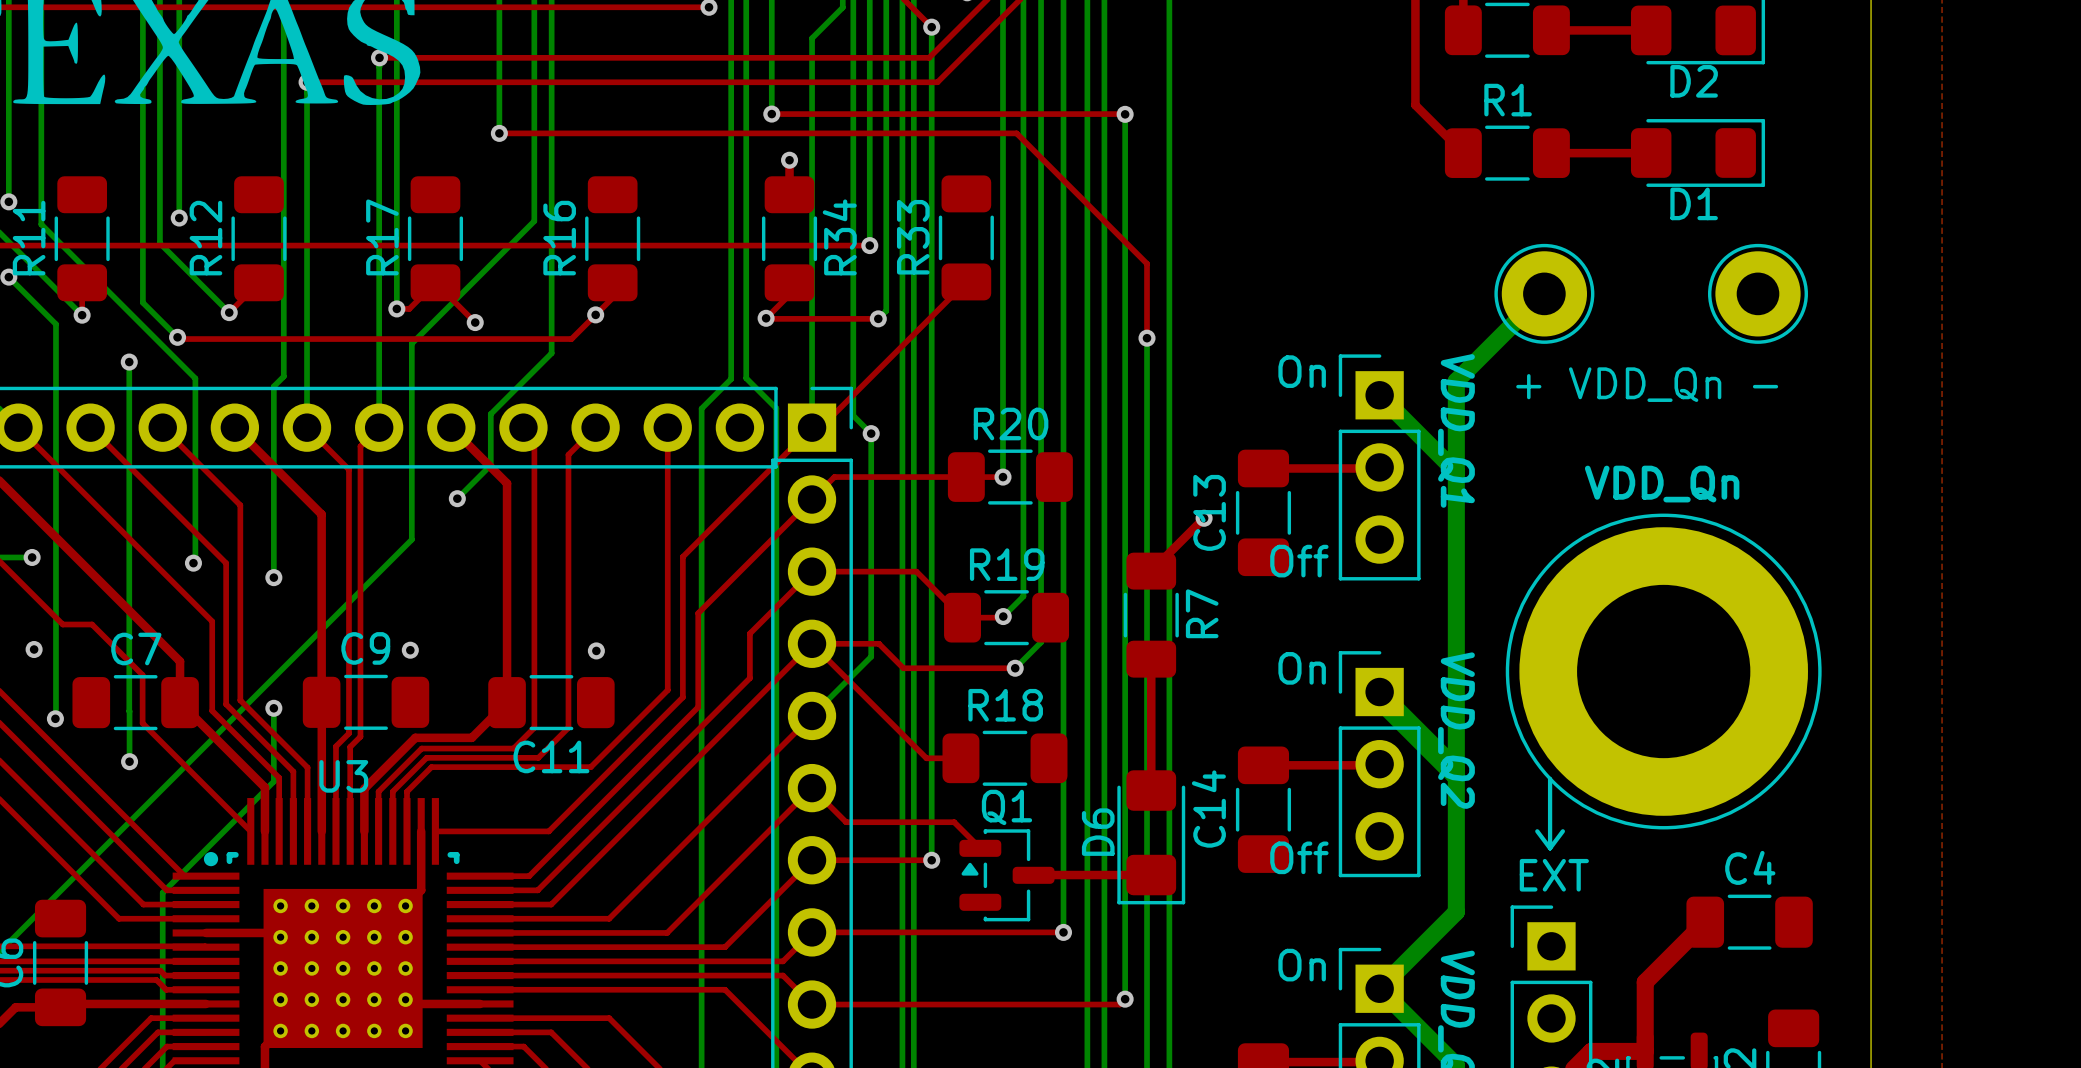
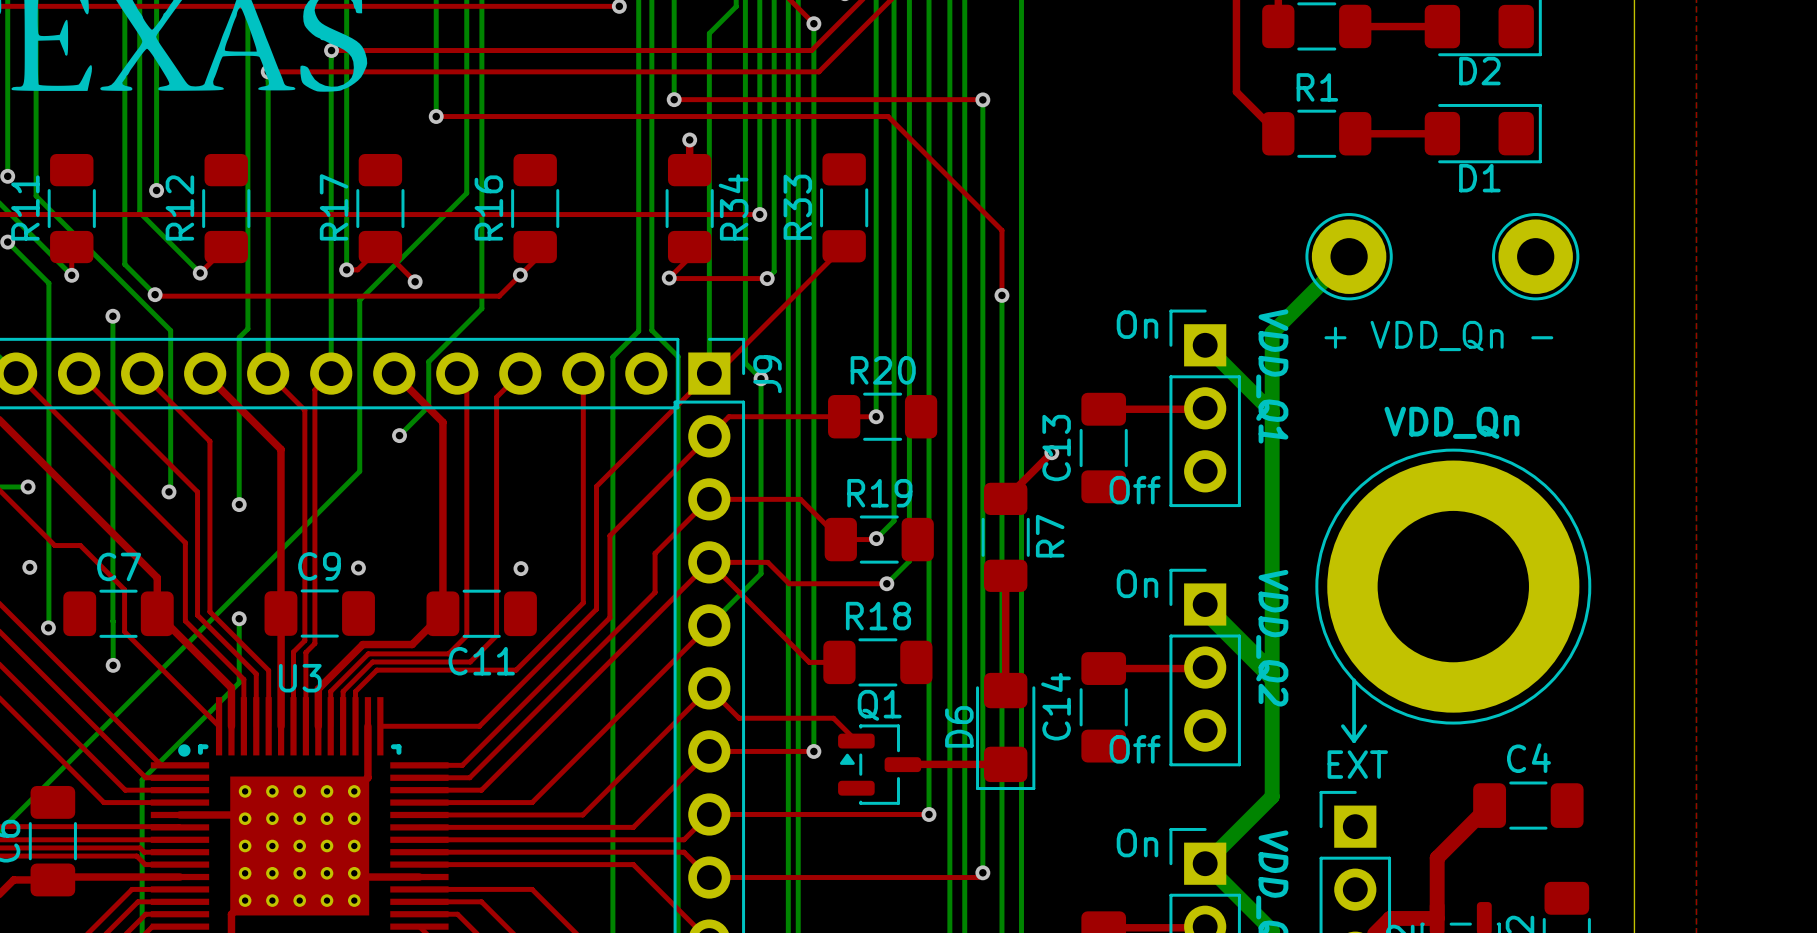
J9 name: none -> J9 (767, 374)

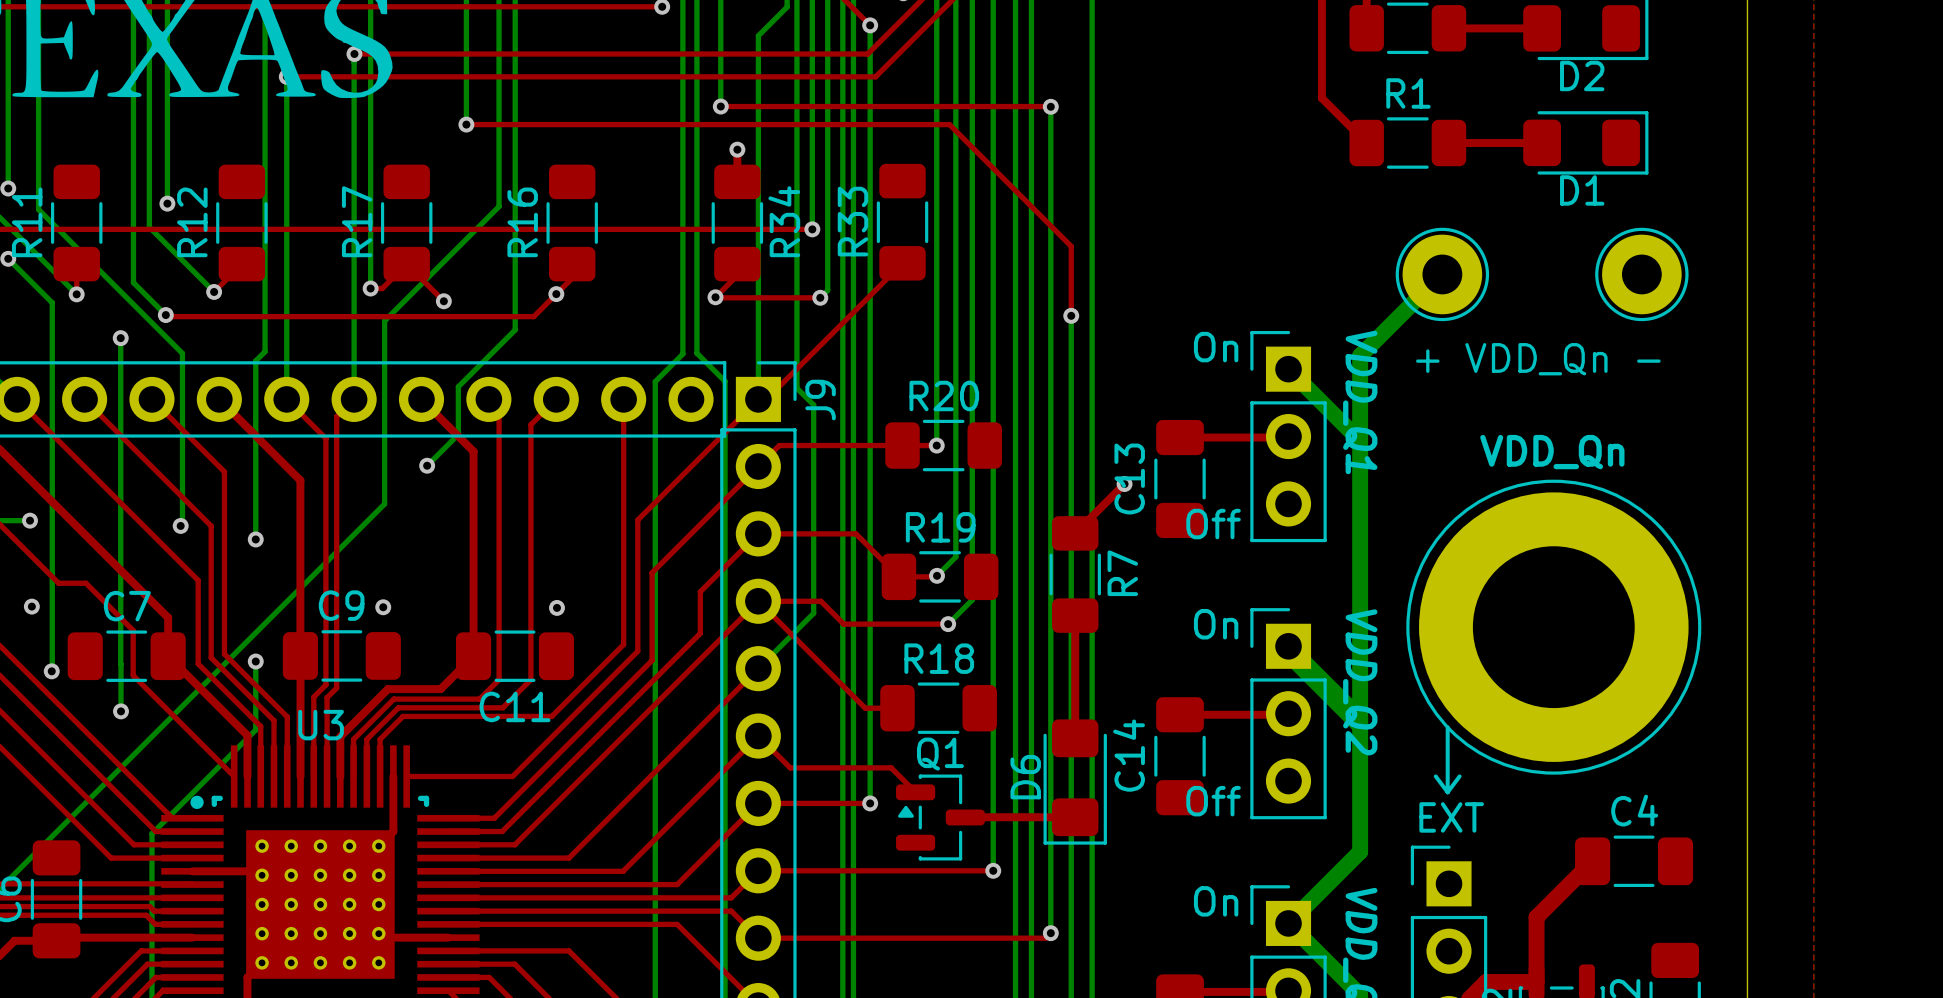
via: (761, 378) -> none

